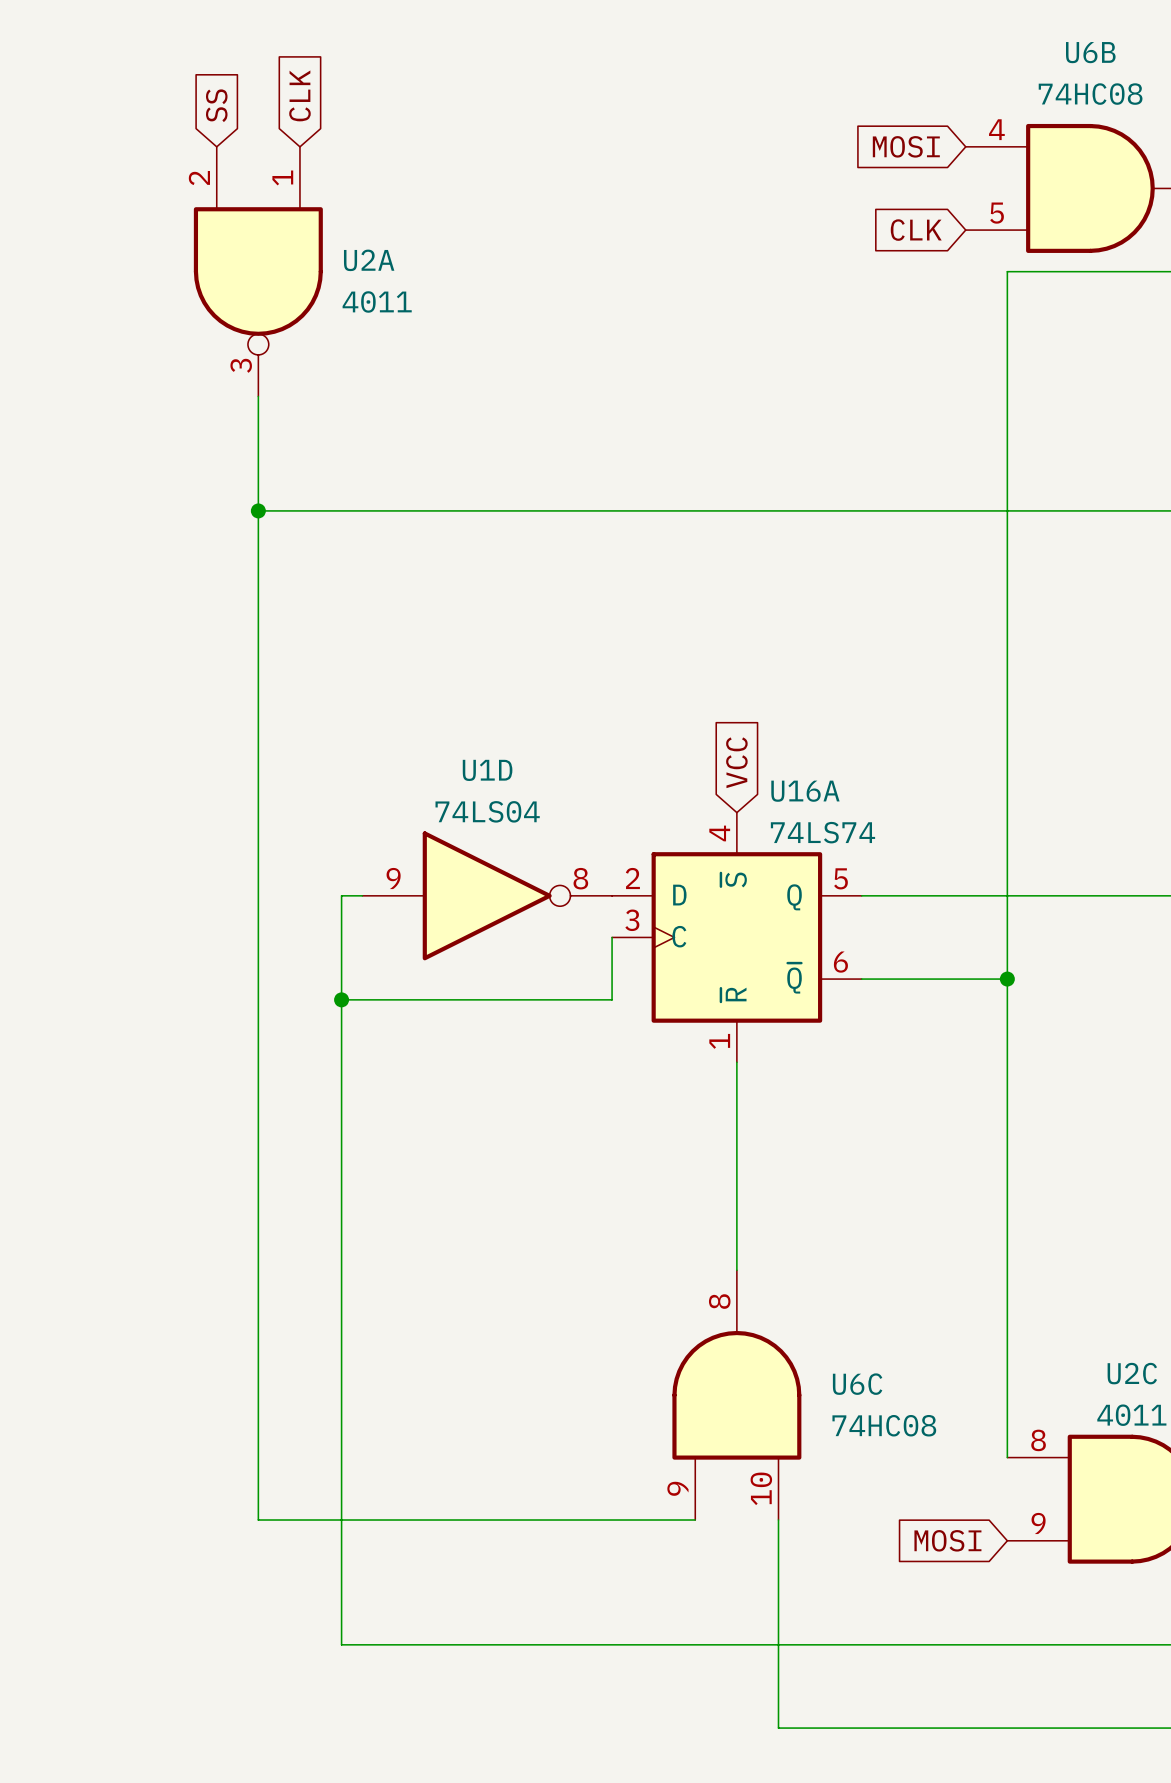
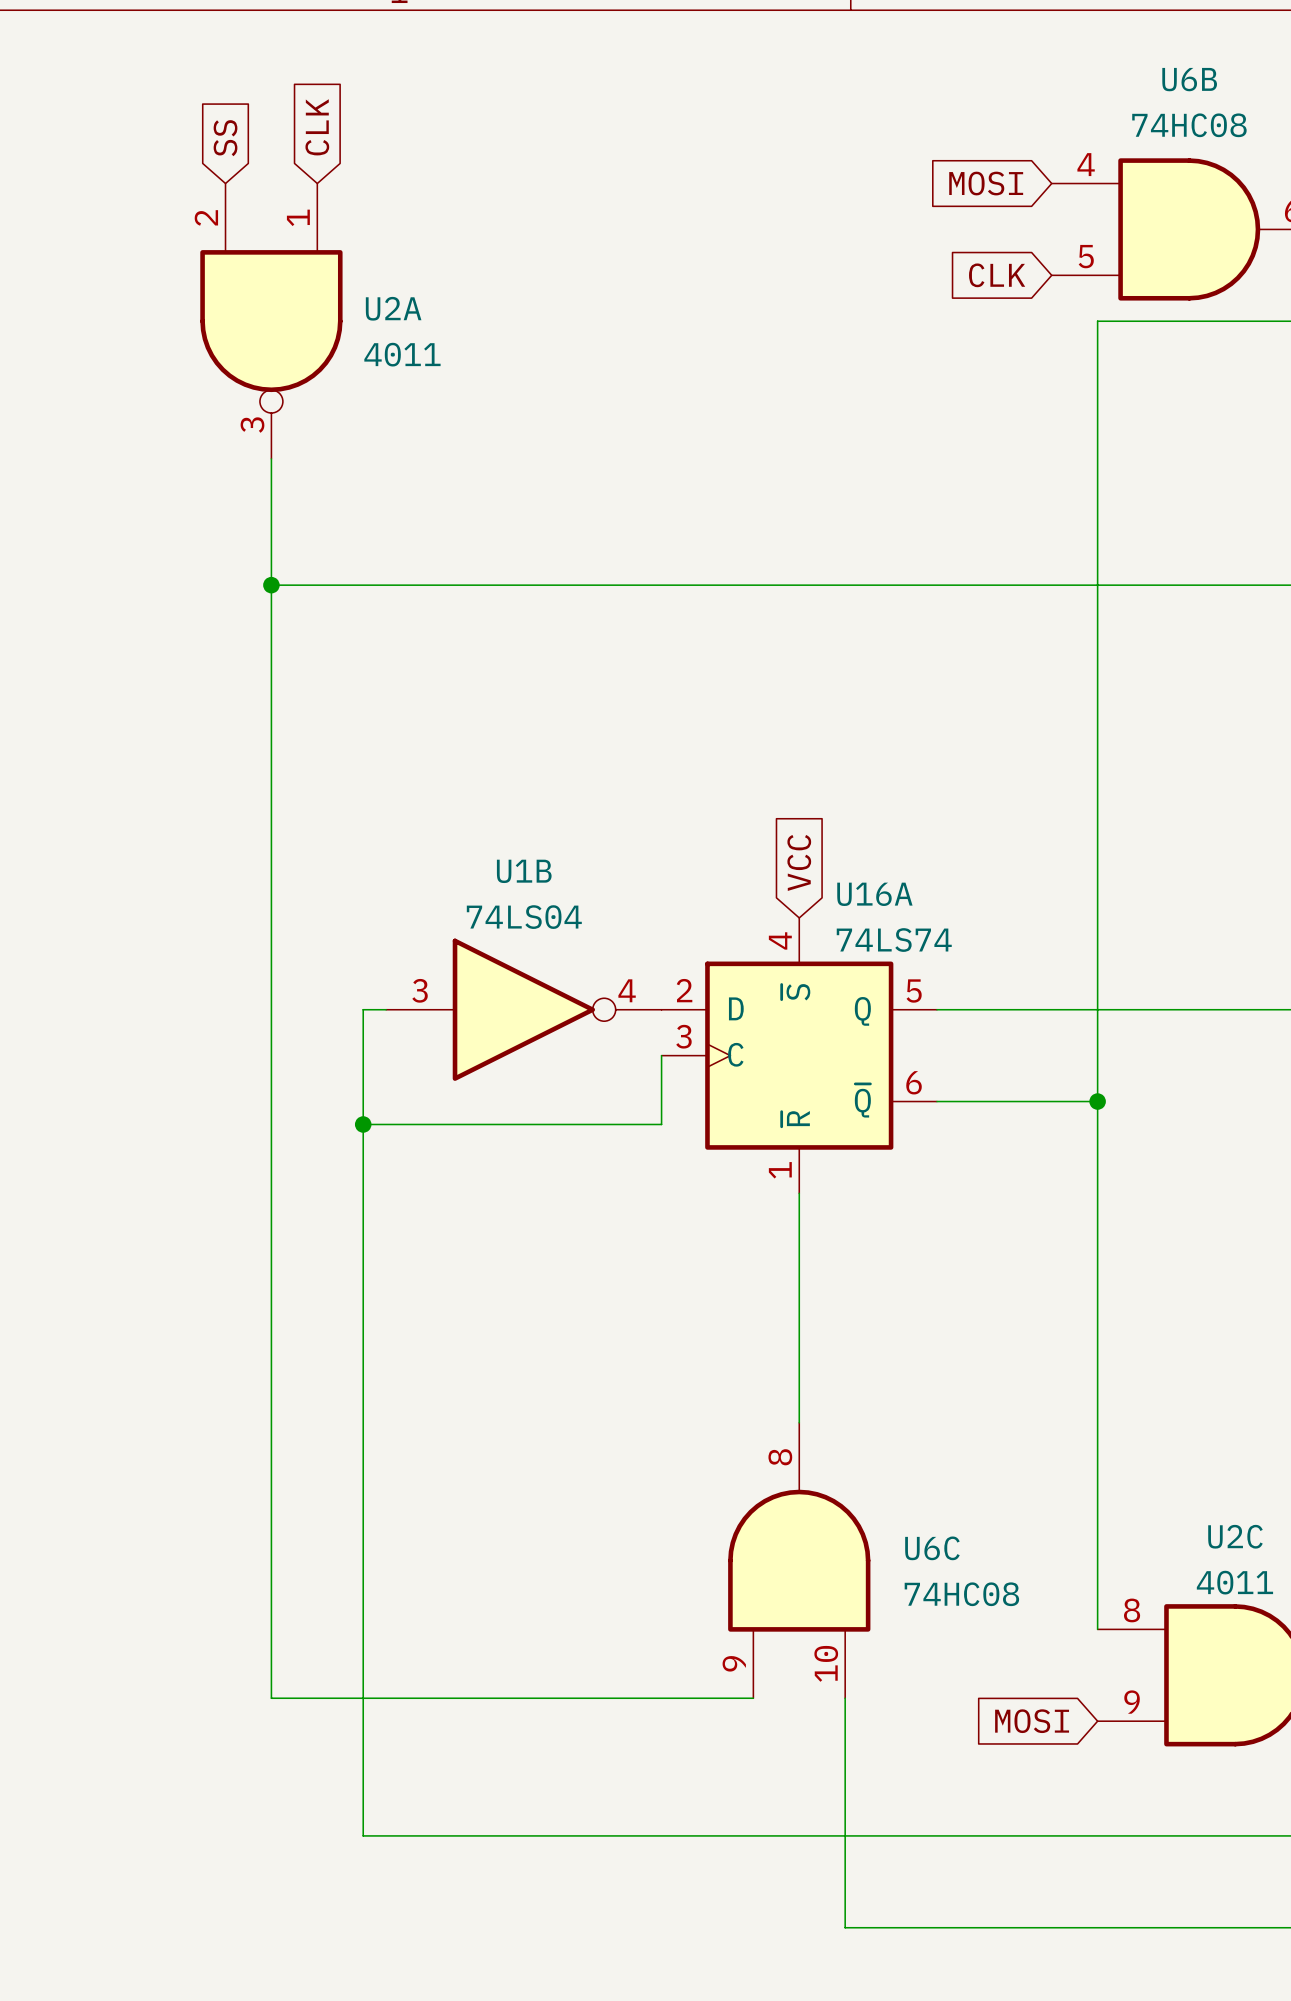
U1D name: U1D (487, 770) -> U1B (524, 871)
U1D pin number: 9 (393, 878) -> 3 (420, 990)
U1D pin number: 8 (580, 878) -> 4 (627, 990)

